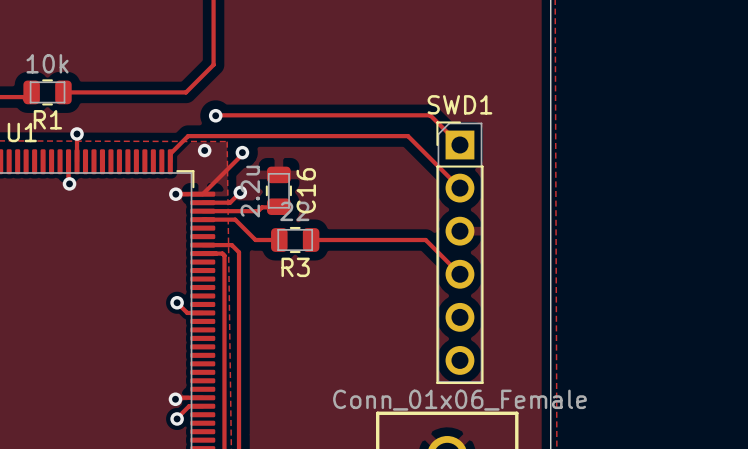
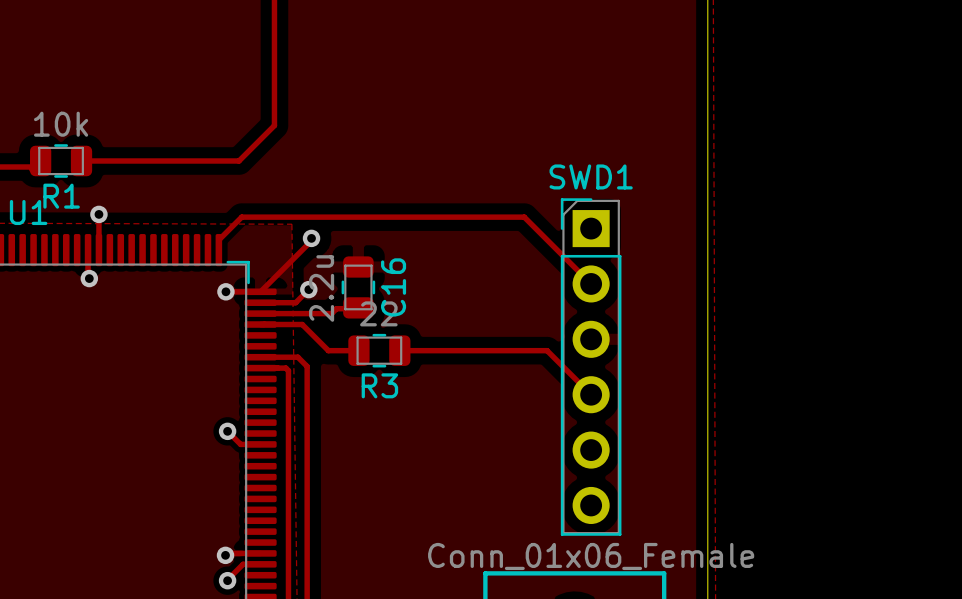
track: (215, 115) (429, 114) (459, 145) -> none
via: (215, 115) -> none
via: (204, 150) -> none

